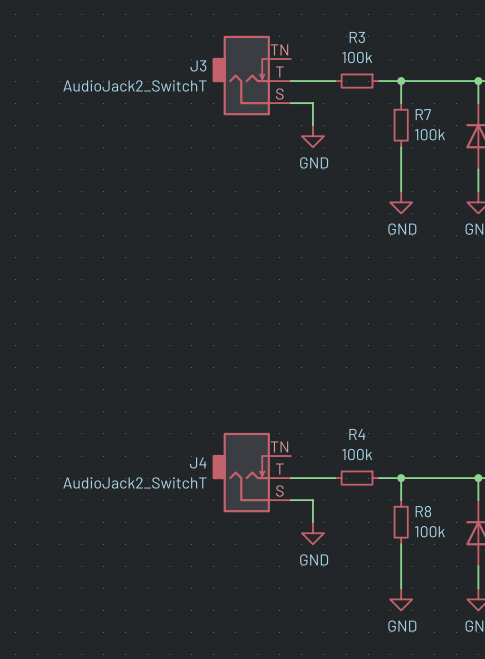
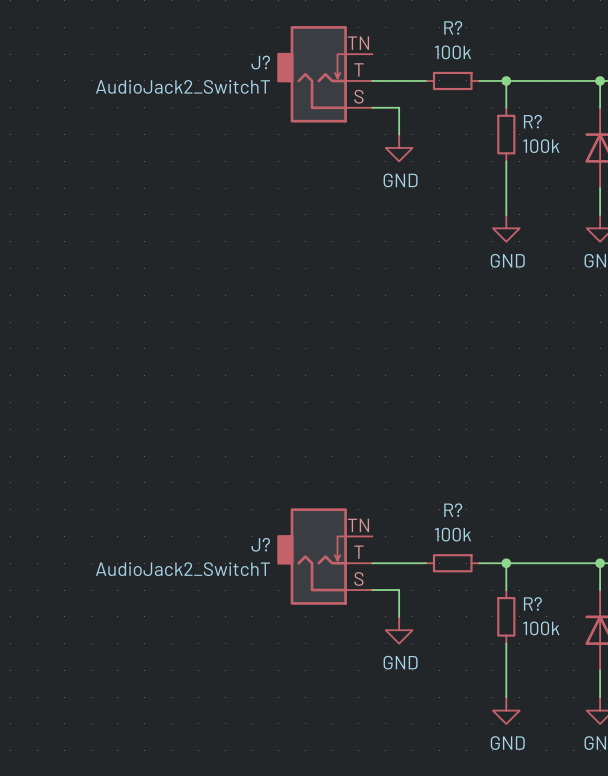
R3 name: R3 (357, 37) -> R? (453, 27)
J3 name: J3 (198, 65) -> J? (260, 62)
R7 name: R7 (423, 114) -> R? (532, 121)
R4 name: R4 (357, 434) -> R? (453, 510)
J4 name: J4 (198, 462) -> J? (260, 544)
R8 name: R8 (423, 511) -> R? (532, 603)

